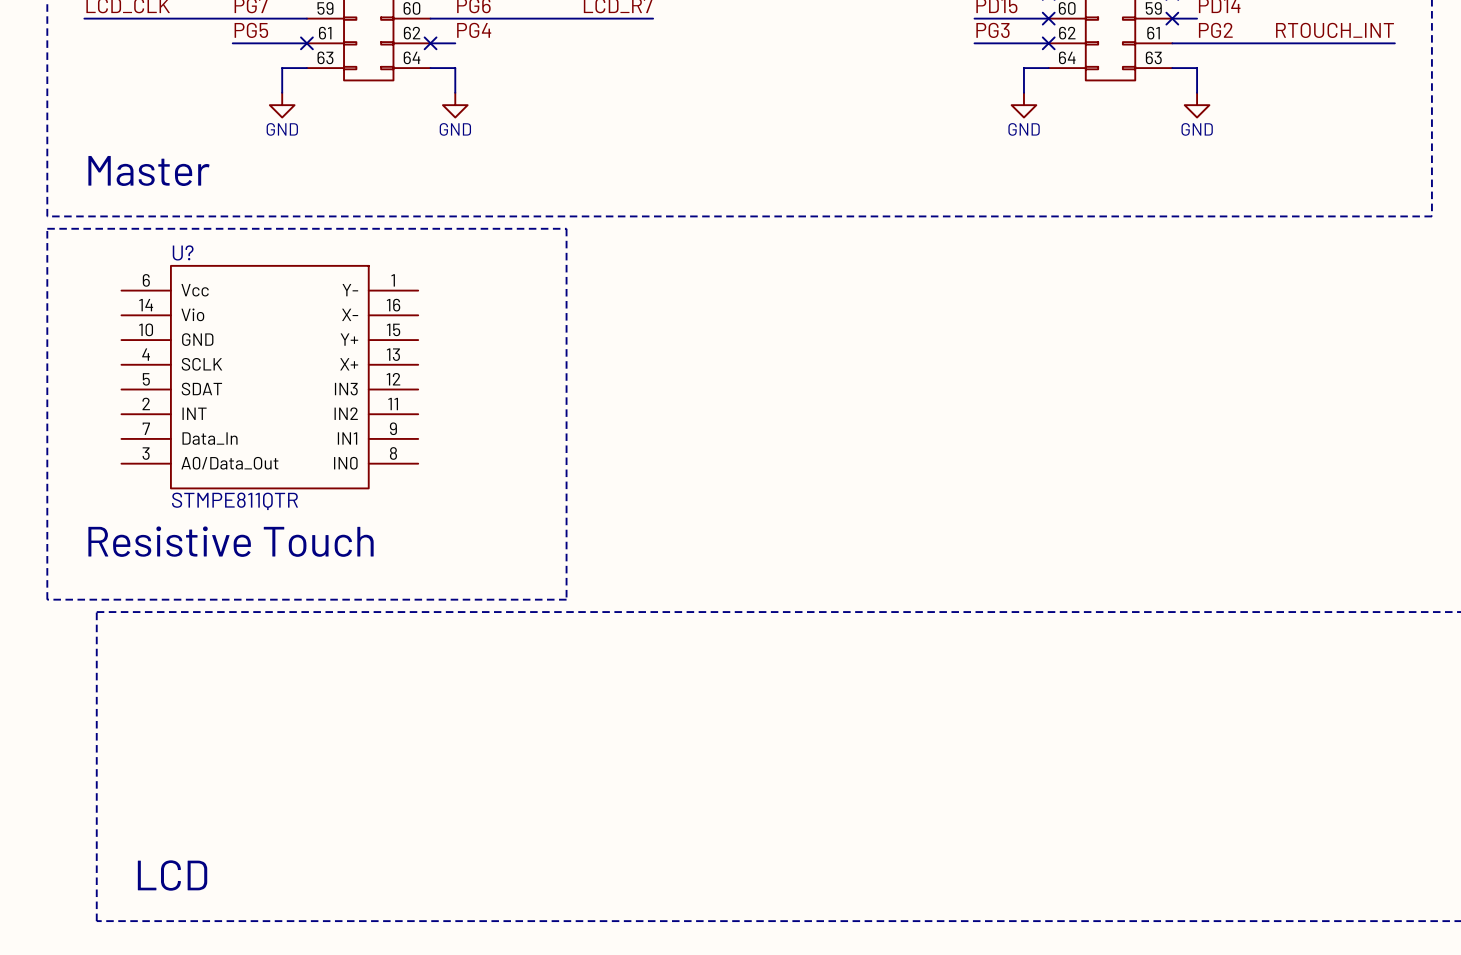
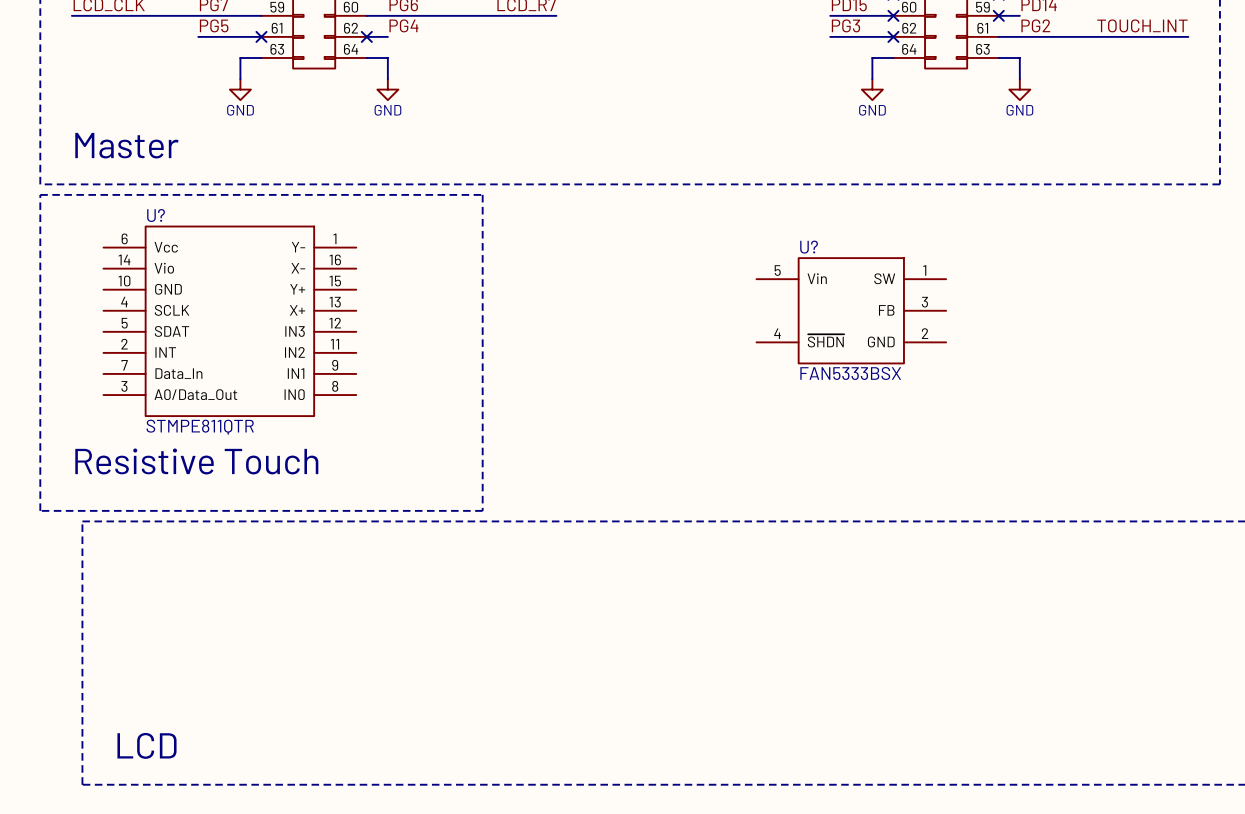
label: RTOUCH_INT (1335, 30) -> TOUCH_INT (1142, 25)
U?: none -> FAN5333BSX (851, 310)

